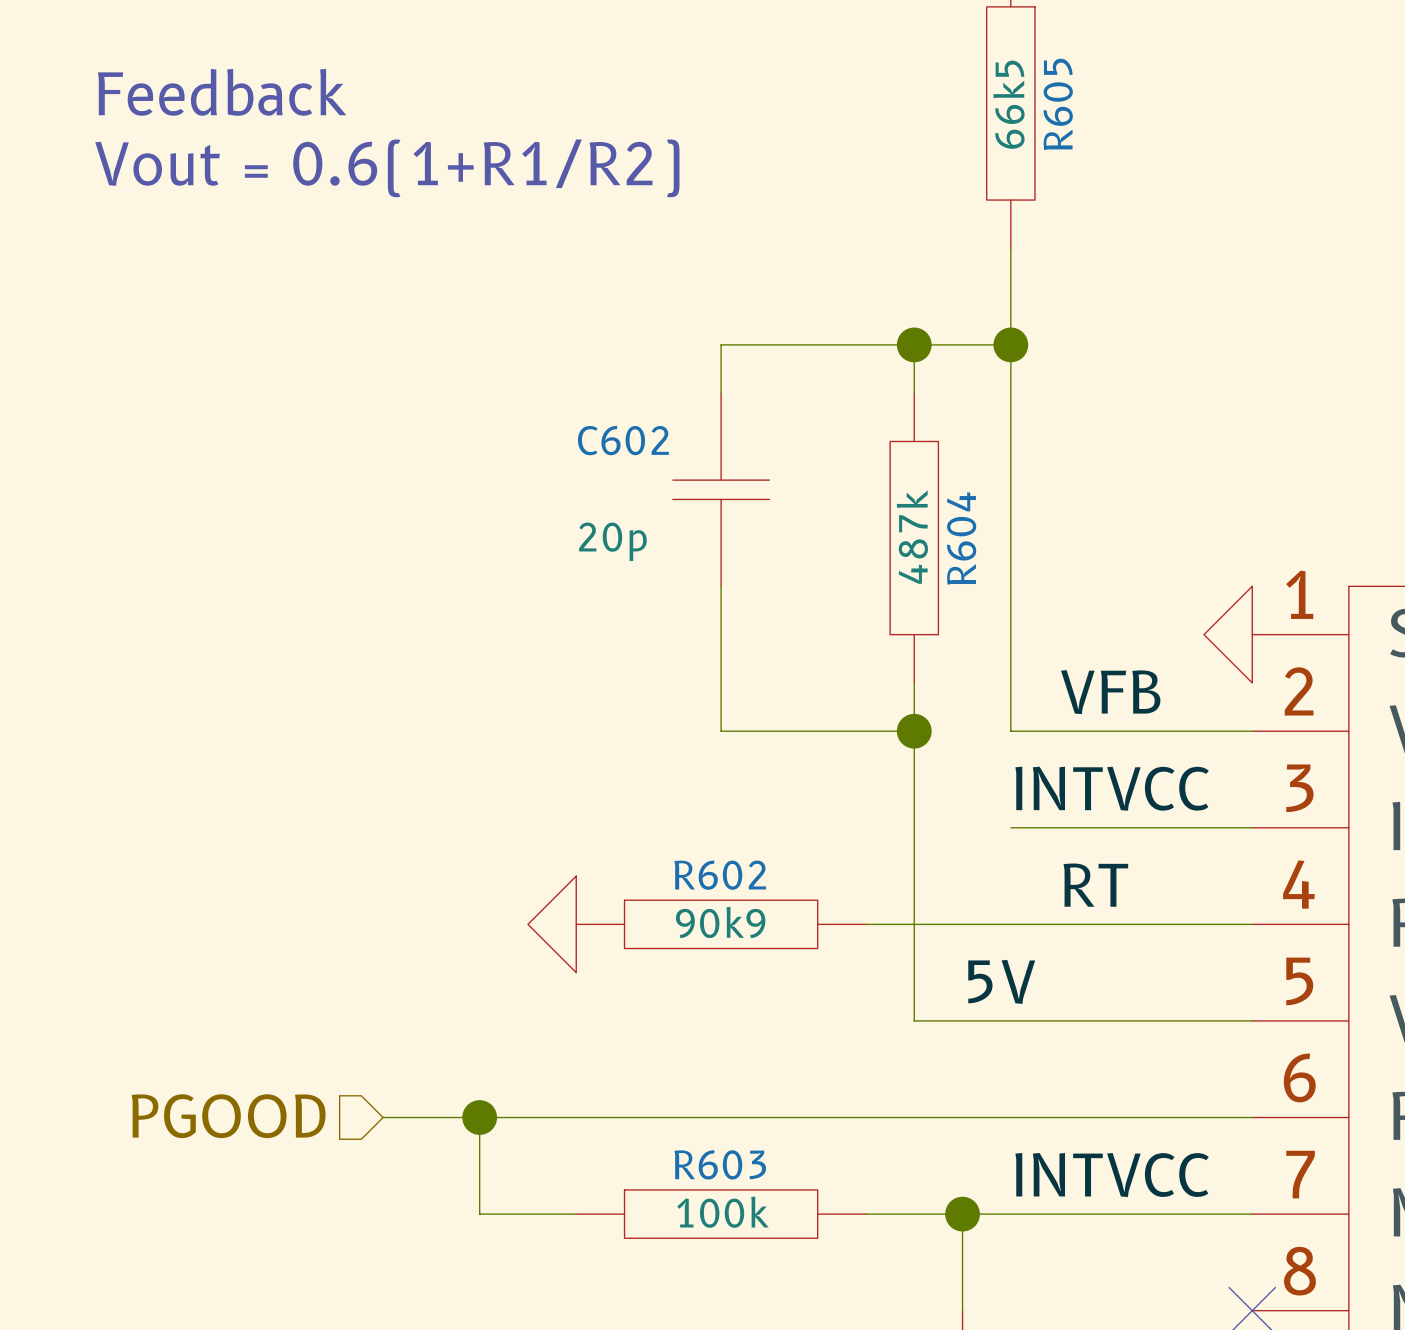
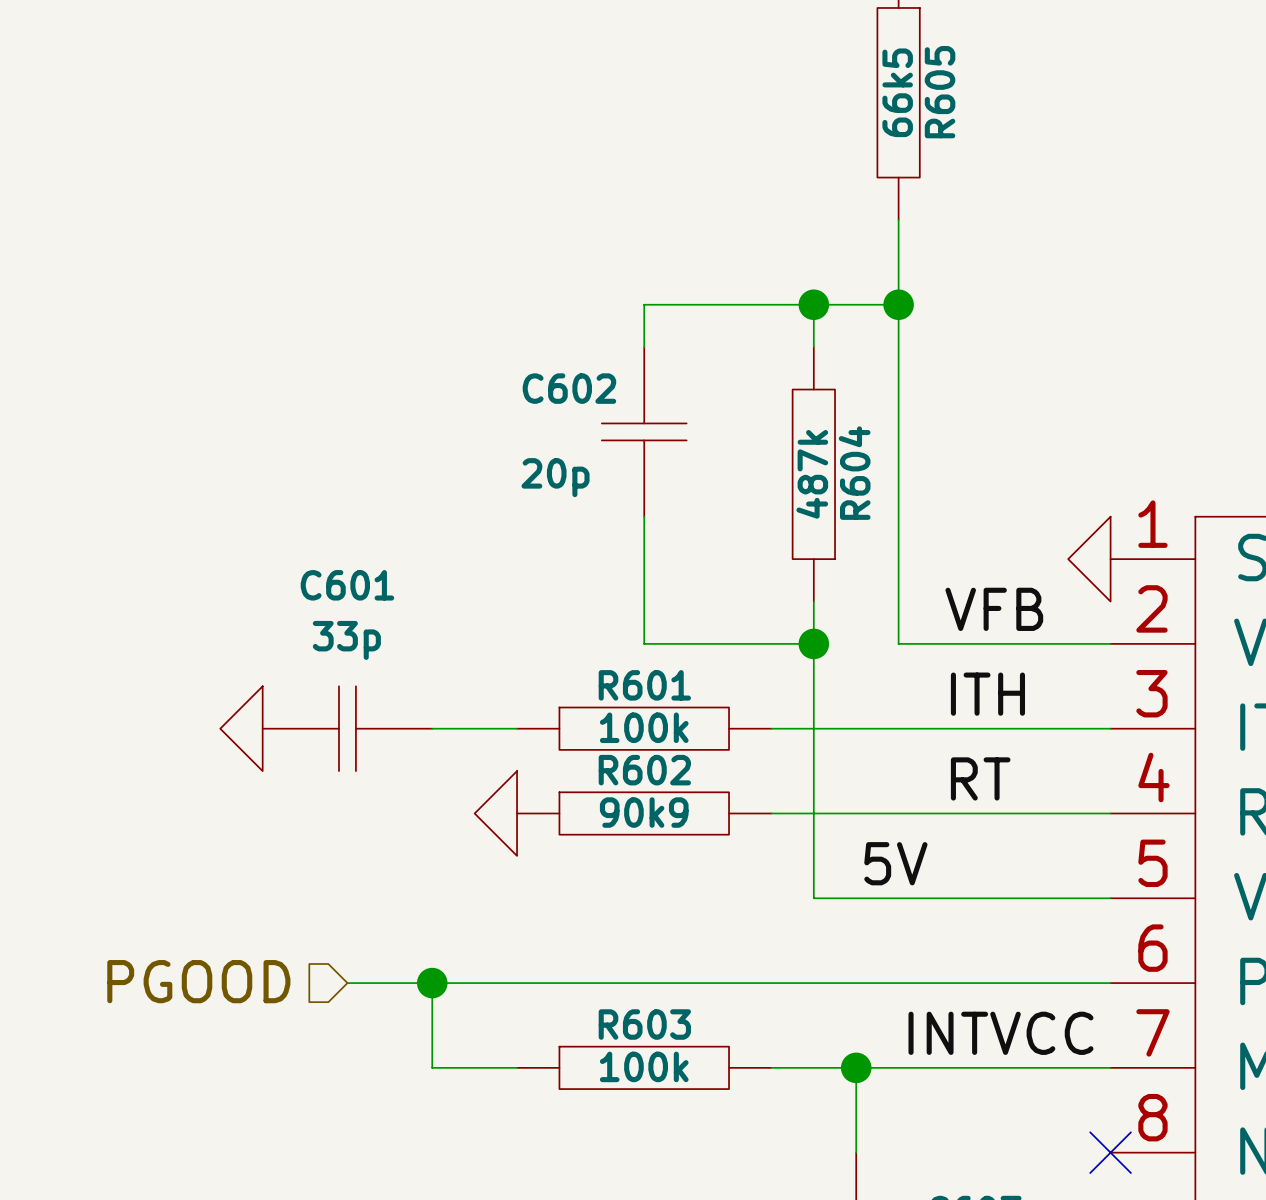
text: Feedback (222, 92) -> none
text: Vout = 0.6(1+R1/R2) (387, 168) -> none
label: none -> ITH (987, 694)
label: INTVCC (1112, 788) -> none
power symbol: none -> (241, 728)
C601: none -> 33p (347, 728)
wire: none -> (432, 728) (517, 728)
R601: none -> 100k (644, 728)
wire: none -> (771, 728) (898, 728)

